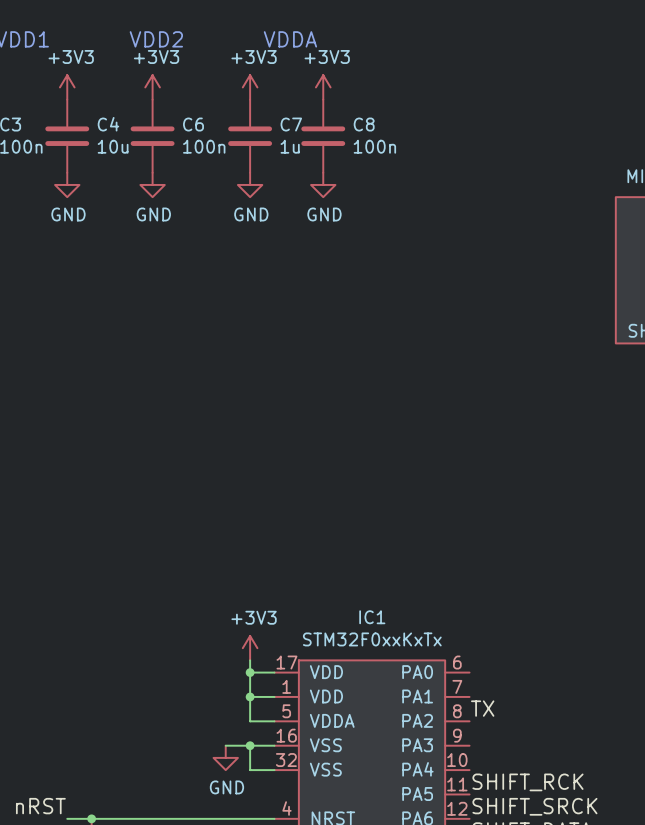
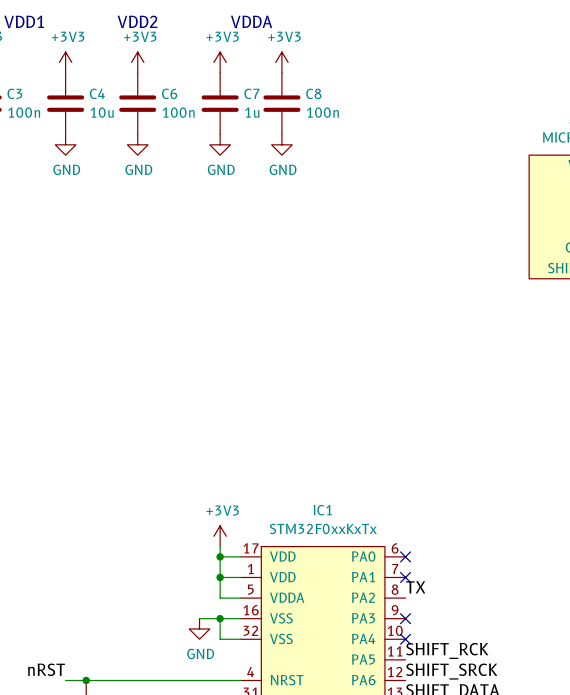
no-connect mark: none -> (405, 556)
no-connect mark: none -> (405, 577)
no-connect mark: none -> (405, 618)
no-connect mark: none -> (405, 639)

